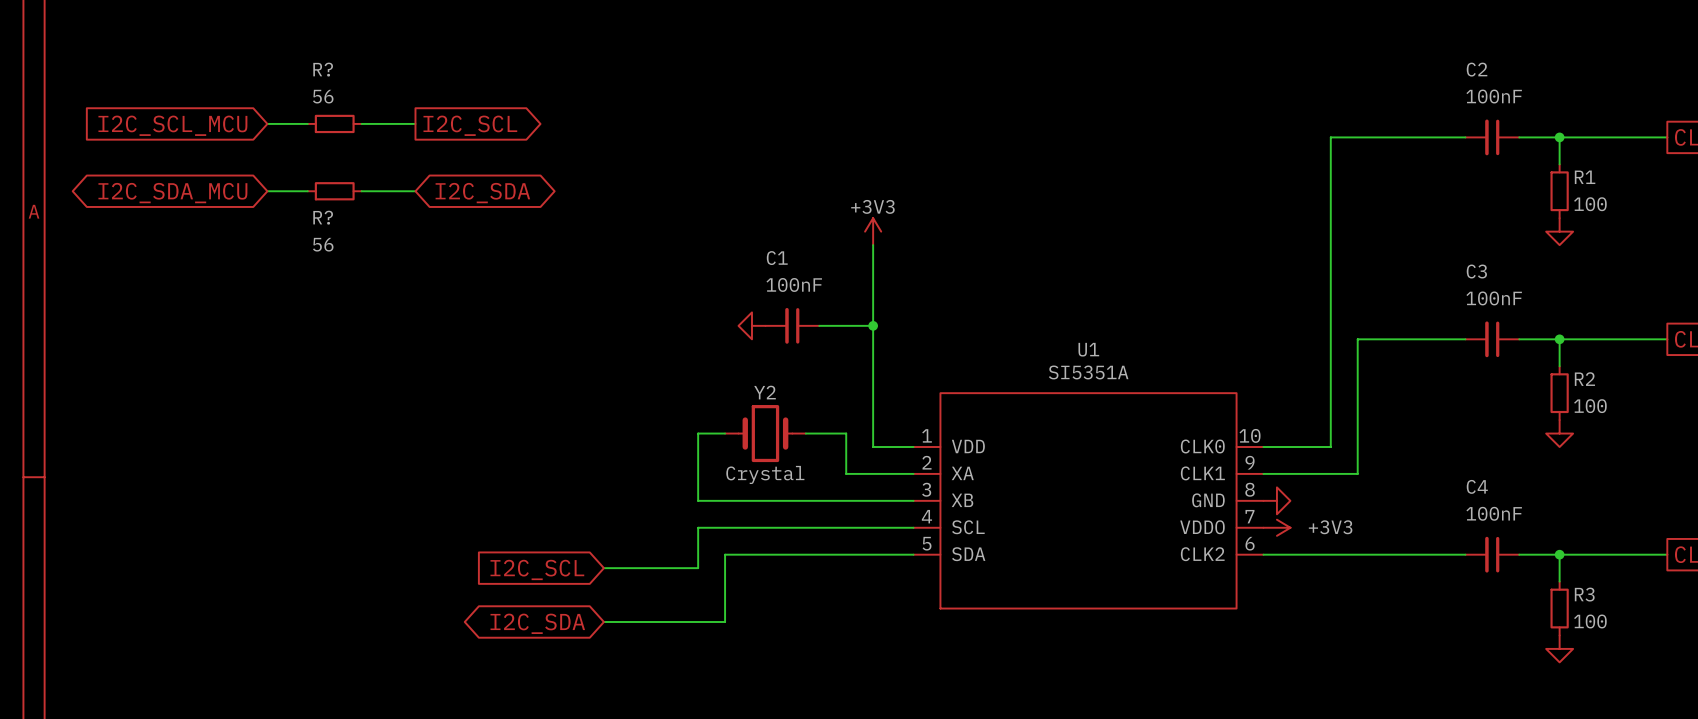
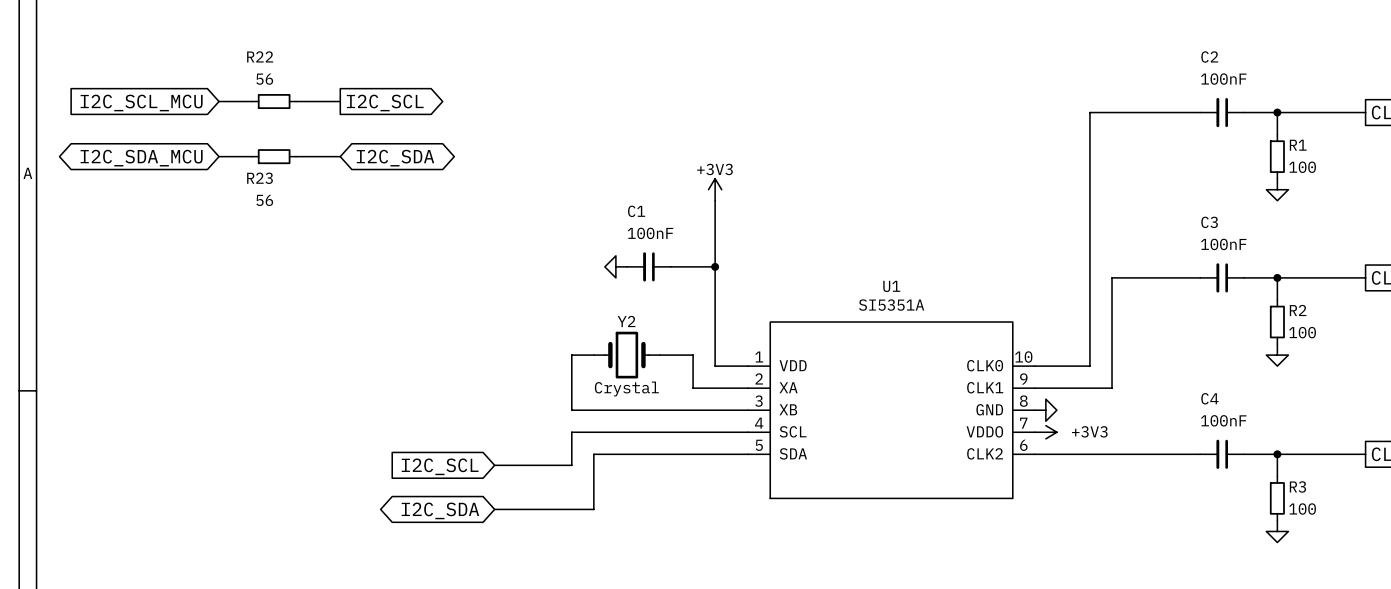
R? name: R? (323, 69) -> R22 (260, 56)
R? name: R? (323, 217) -> R23 (259, 178)

